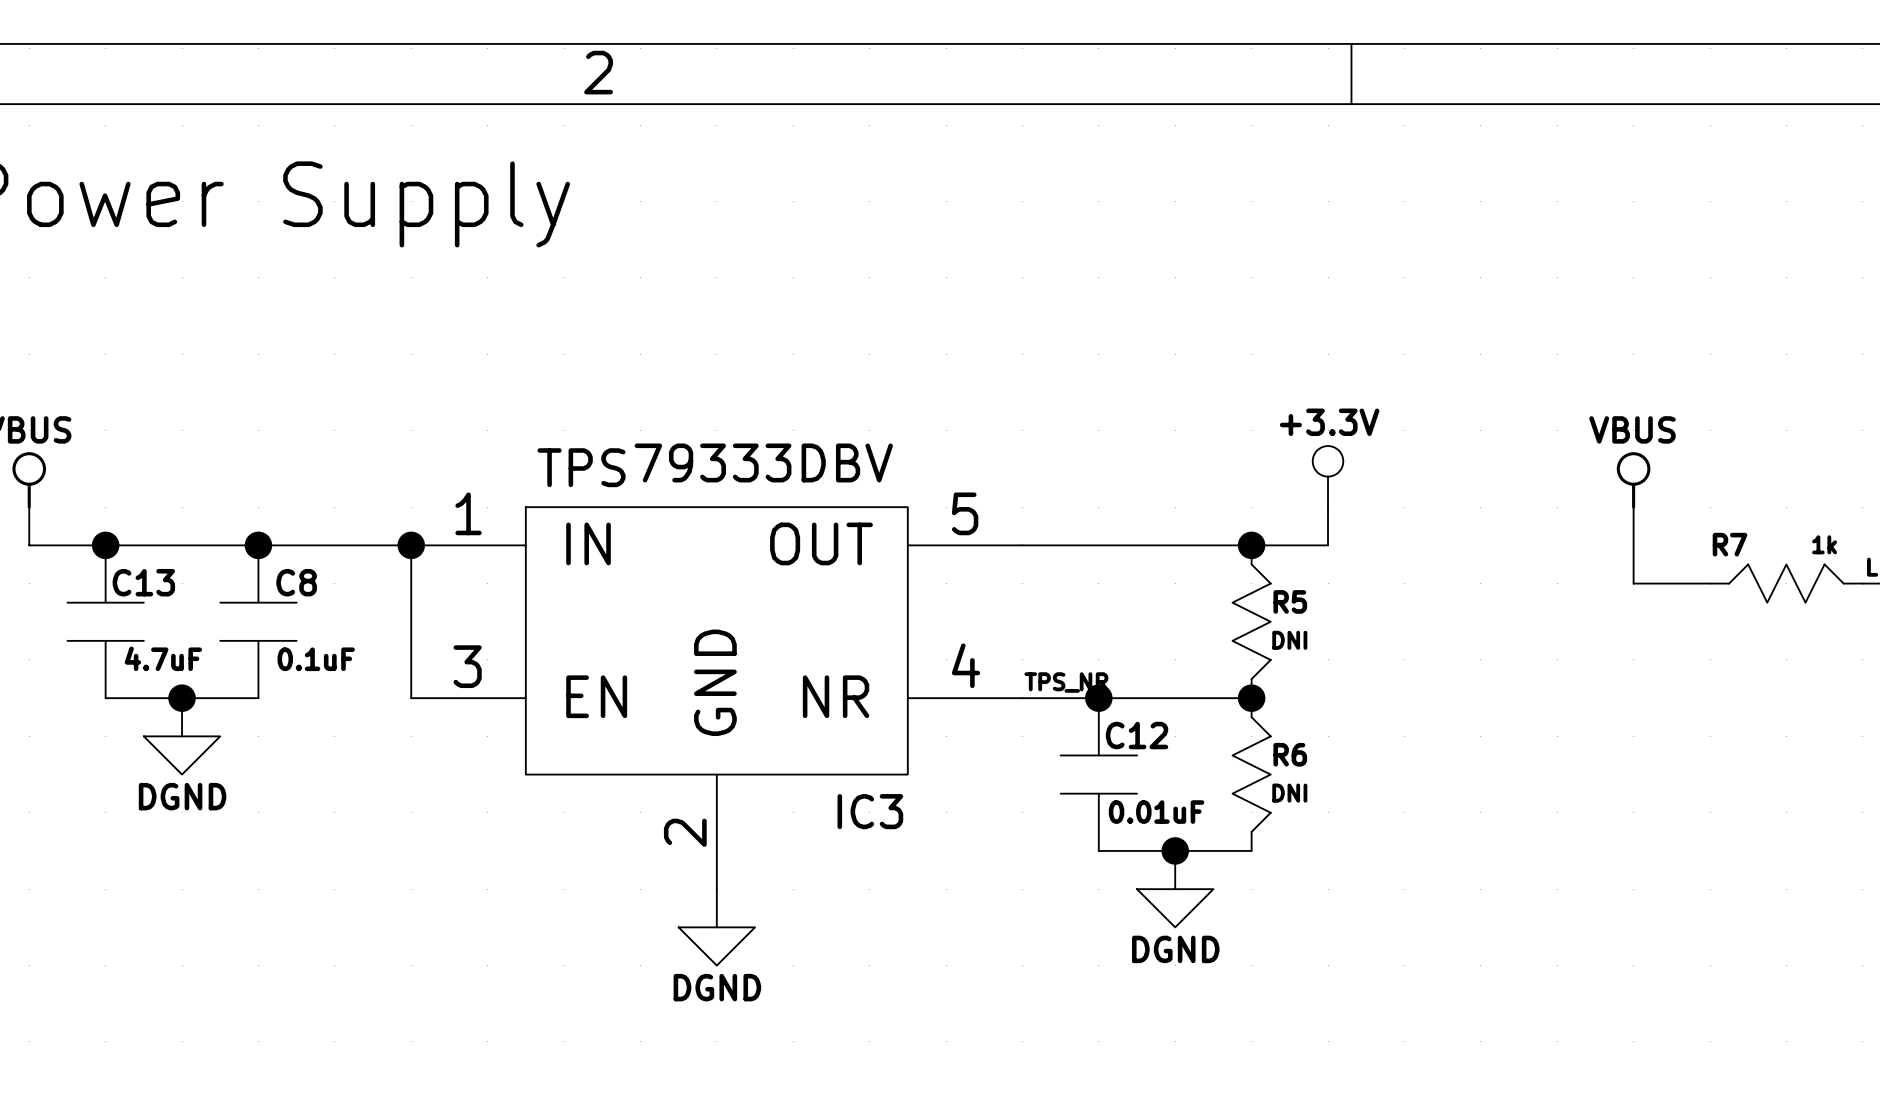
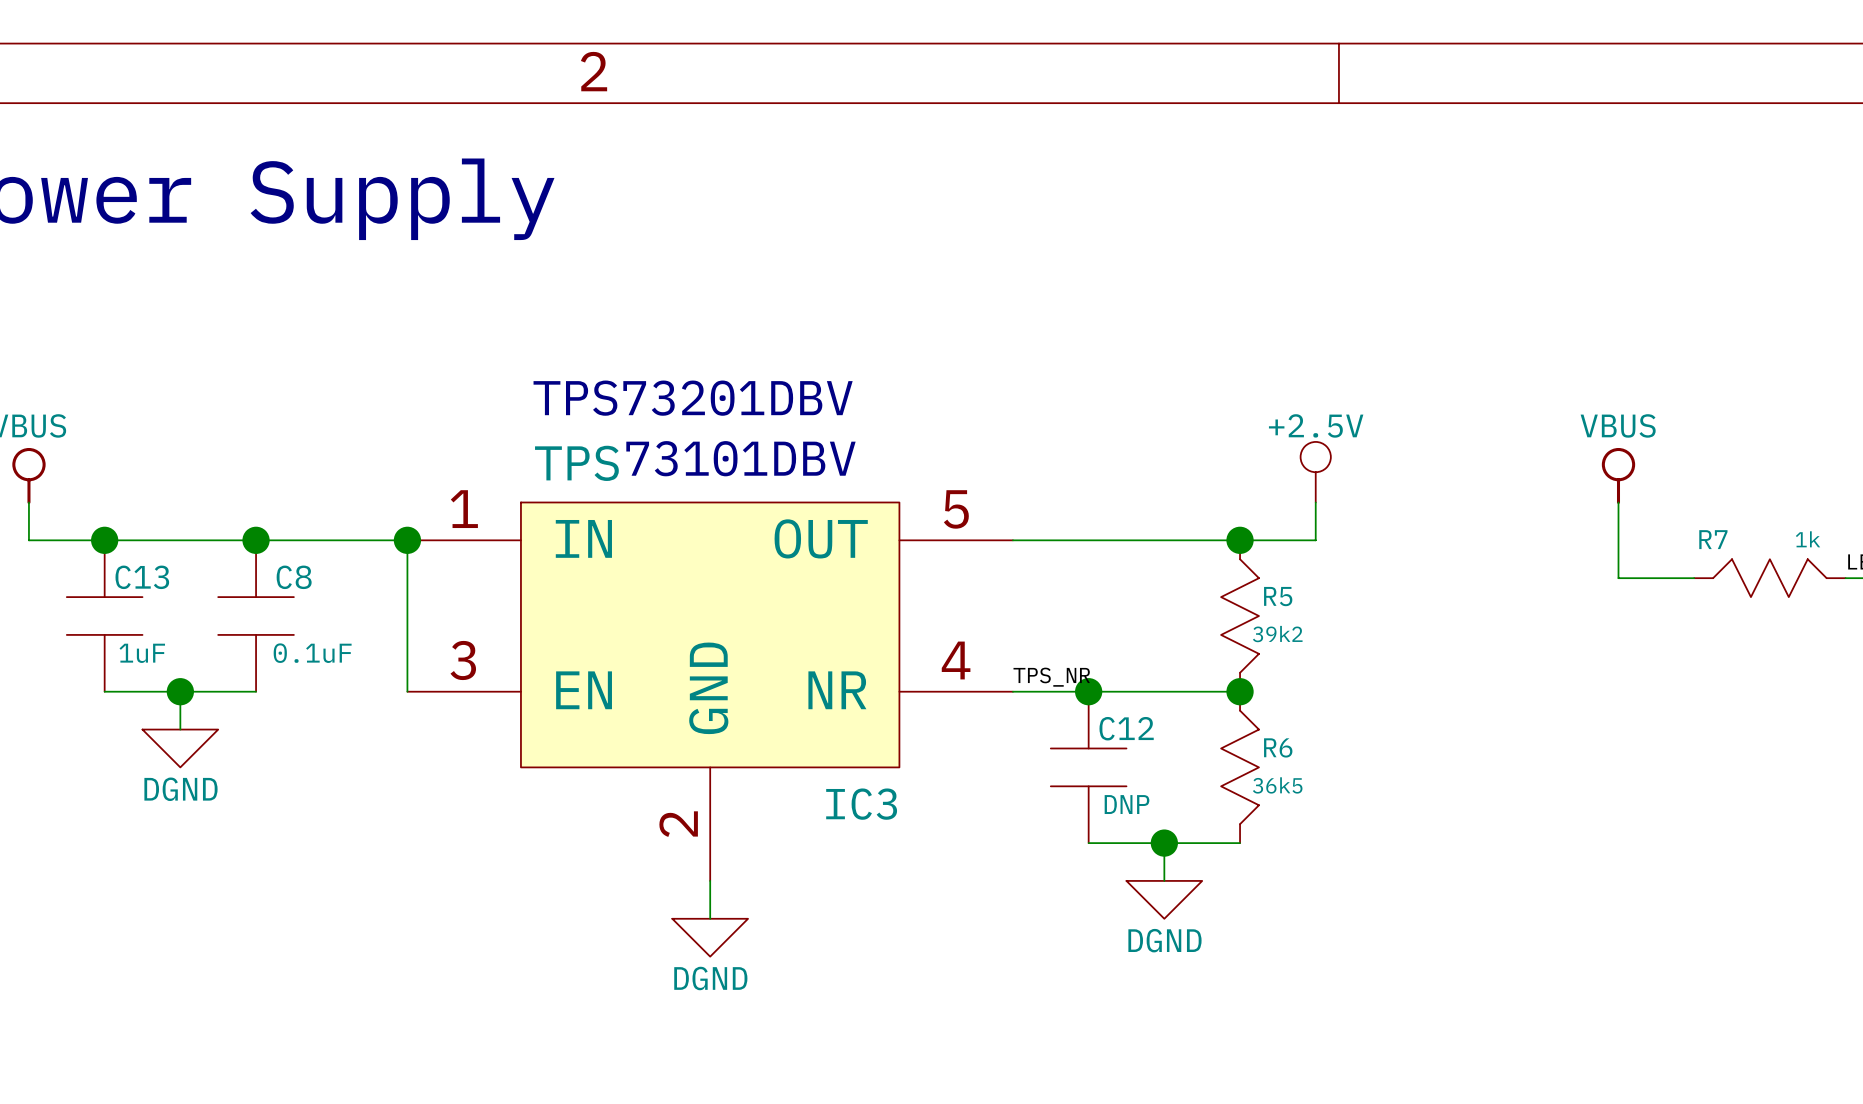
text: none -> TPS73201DBV (693, 398)
text: 79333DBV (763, 462) -> 73101DBV (740, 458)
power symbol: +3.3V (1328, 476) -> +2.5V (1315, 472)
R5 value: DNI (1289, 640) -> 39k2 (1277, 634)
C13 value: 4.7uF (163, 658) -> 1uF (142, 653)
R6 value: DNI (1289, 793) -> 36k5 (1277, 785)
C12 value: 0.01uF (1156, 812) -> DNP (1127, 804)

